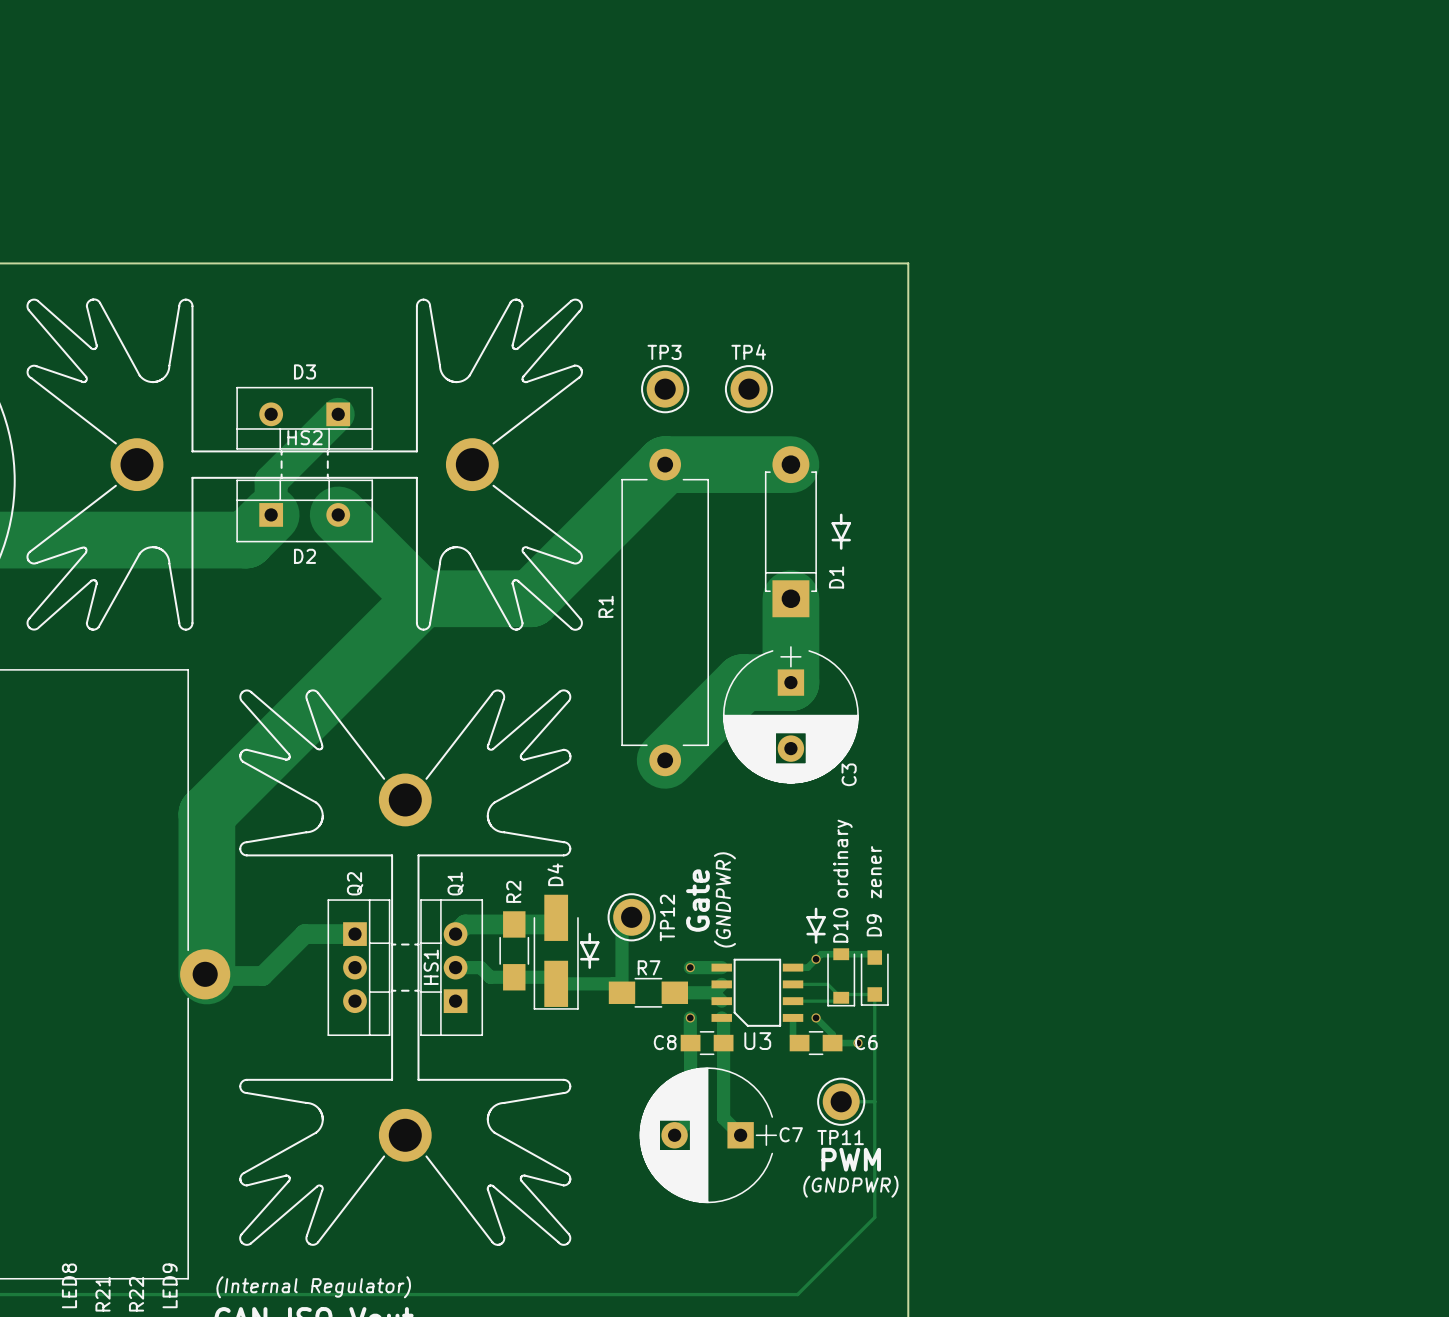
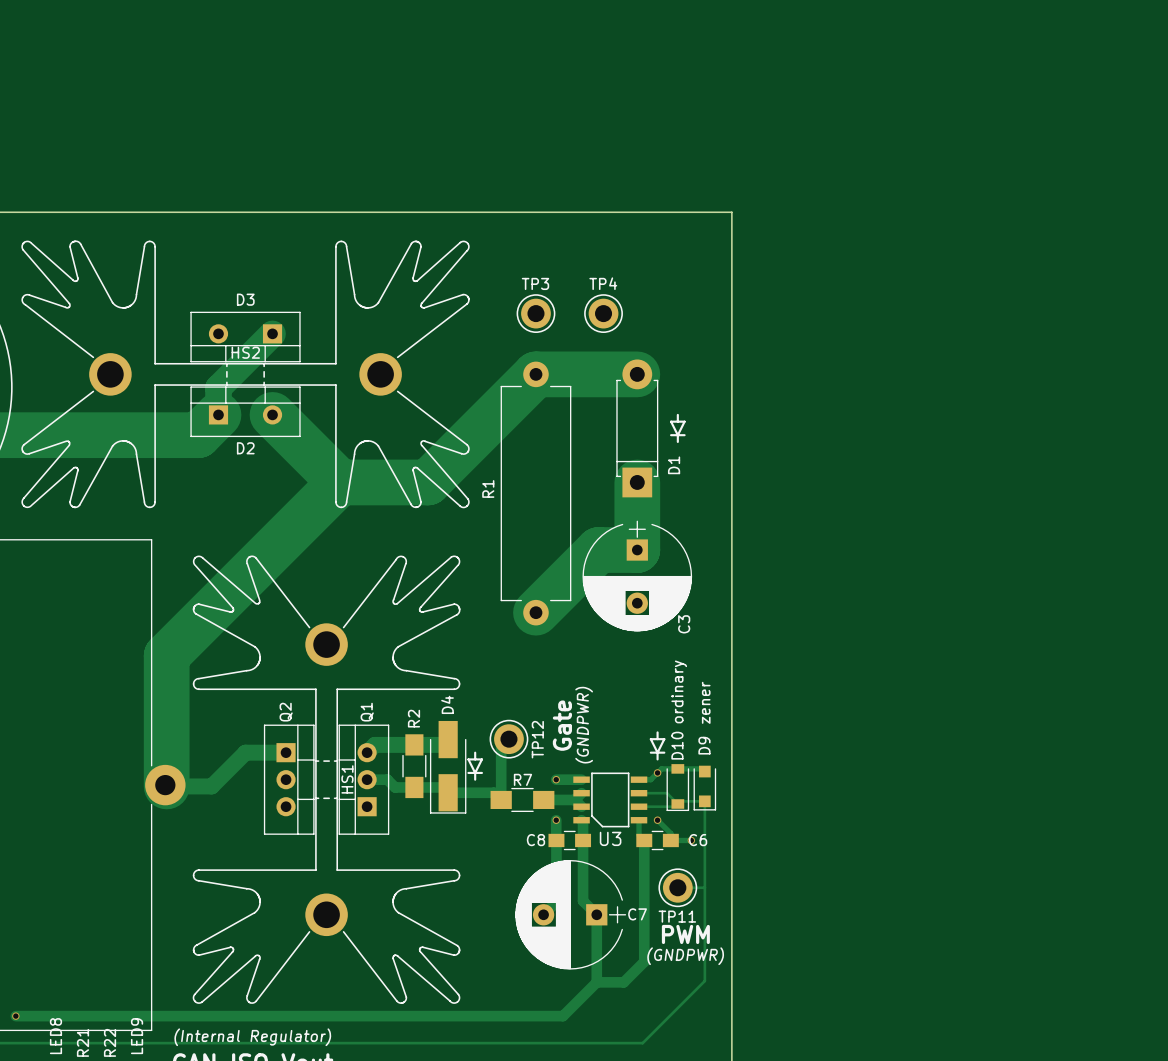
track: none -> (644, 840) (644, 961) (623, 982) (596, 982)
track: none -> (596, 914) (596, 982)
track: none -> (596, 982) (563, 1016) (15, 1016)
via: none -> (15, 1016)

